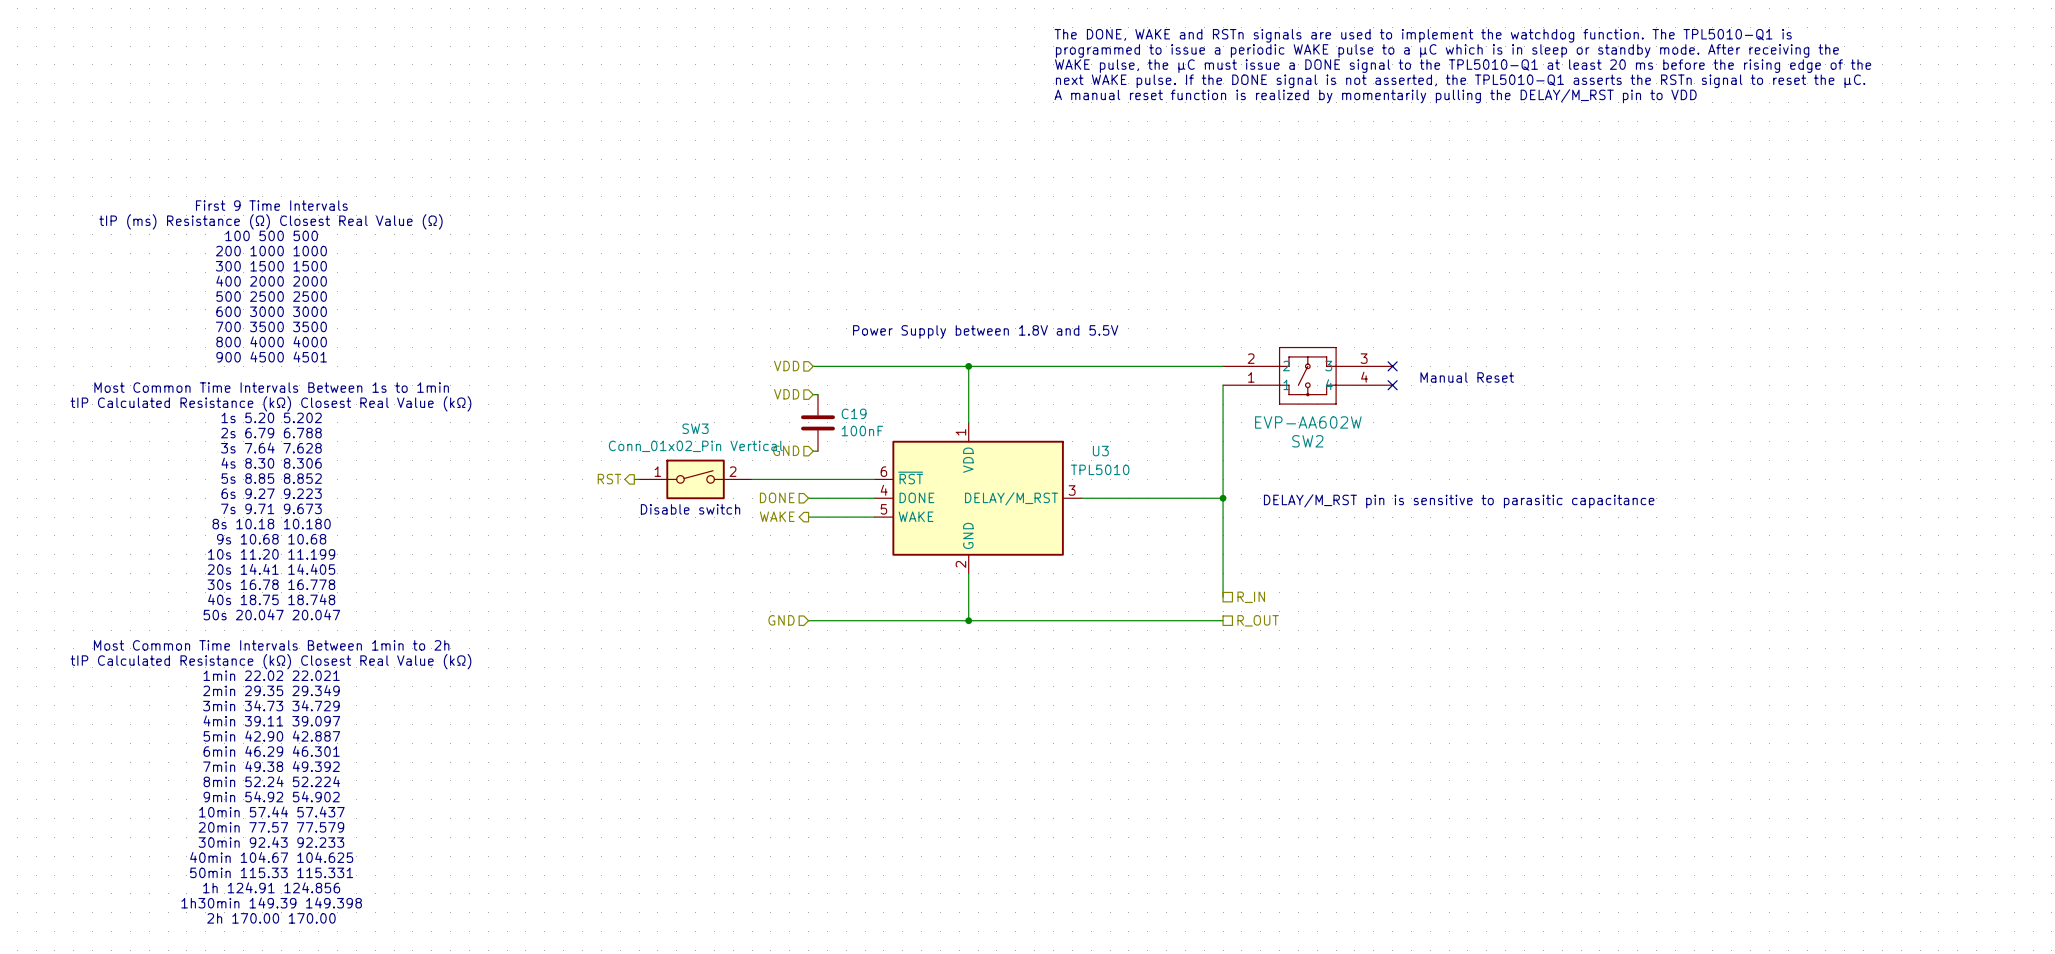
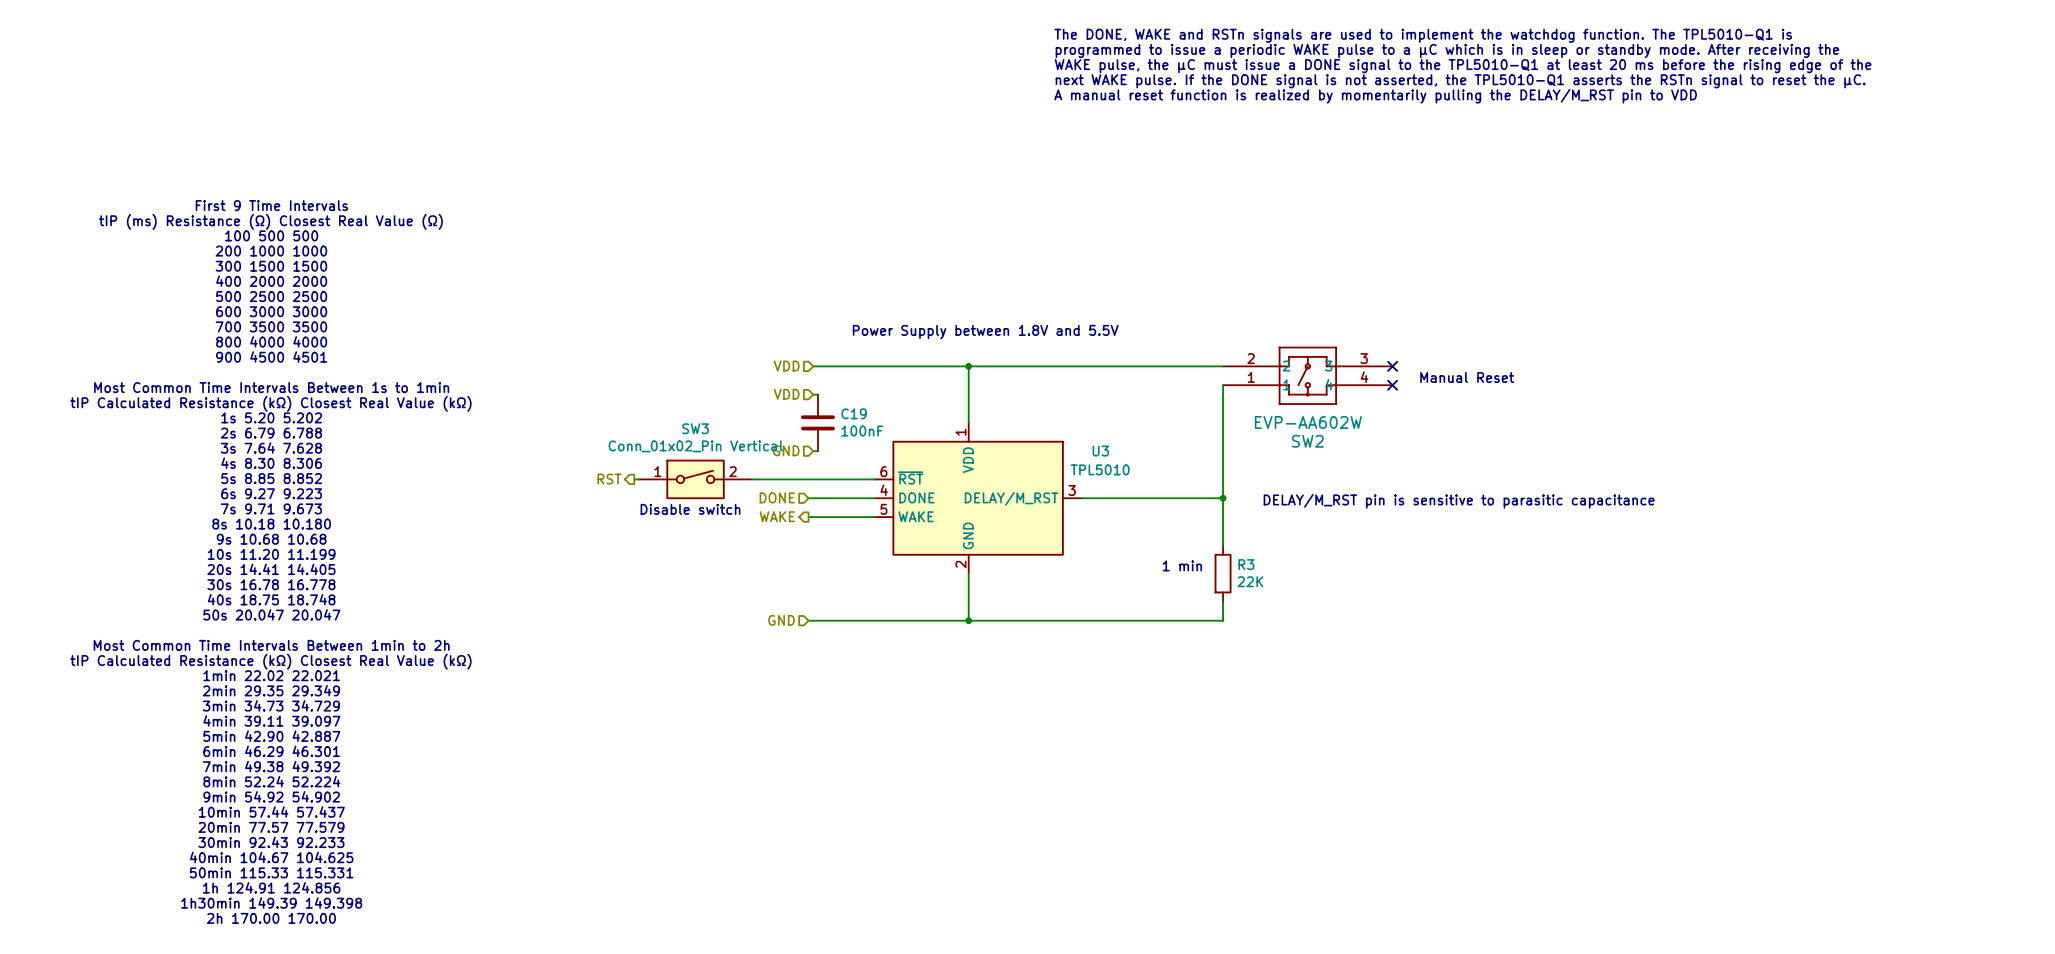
wire: (1223, 545) (1223, 597) -> none
text: none -> 1 min (1182, 565)
R3: none -> 22K (1223, 573)
hierarchical label: R_IN (1251, 597) -> none
wire: none -> (1223, 601) (1223, 620)
hierarchical label: R_OUT (1258, 620) -> none

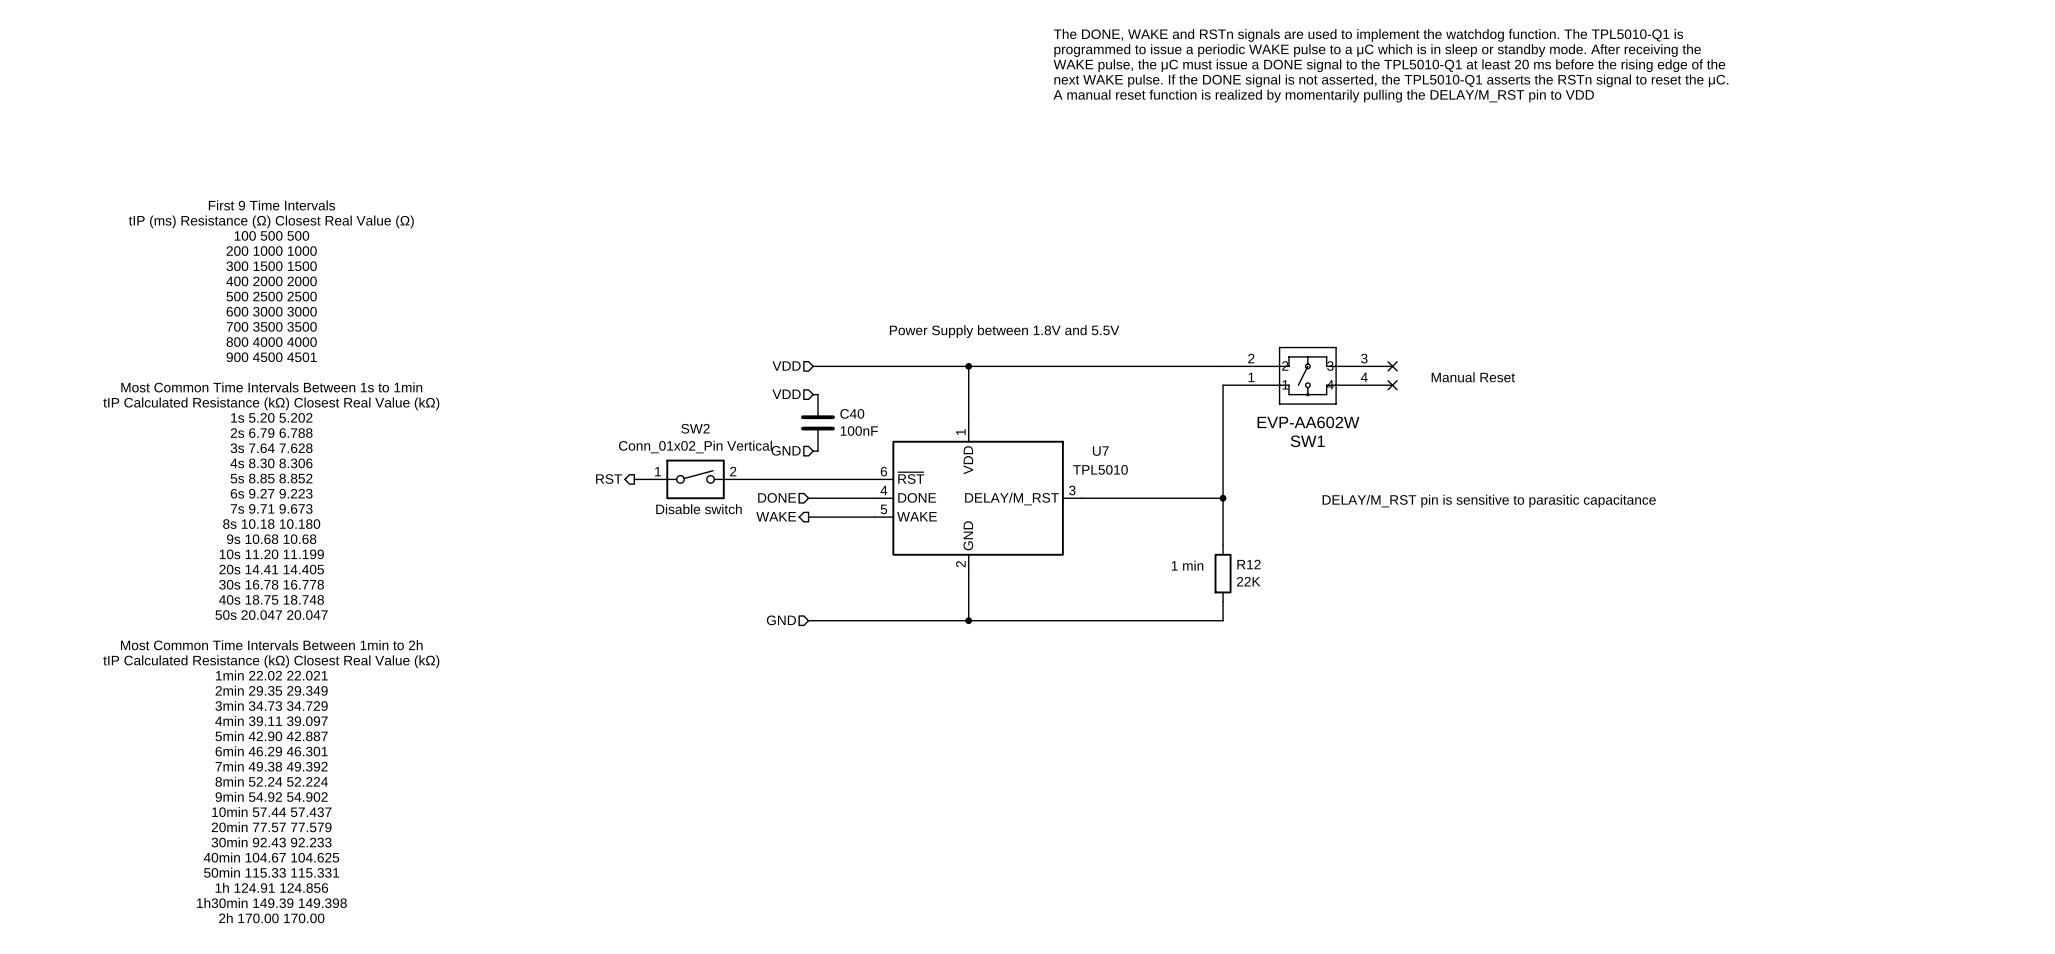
C19 name: C19 (854, 413) -> C40 (852, 413)
SW3 name: SW3 (695, 428) -> SW2 (695, 428)
SW2 name: SW2 (1307, 441) -> SW1 (1307, 441)
U3 name: U3 (1100, 451) -> U7 (1100, 451)
R3 name: R3 (1246, 564) -> R12 (1249, 564)

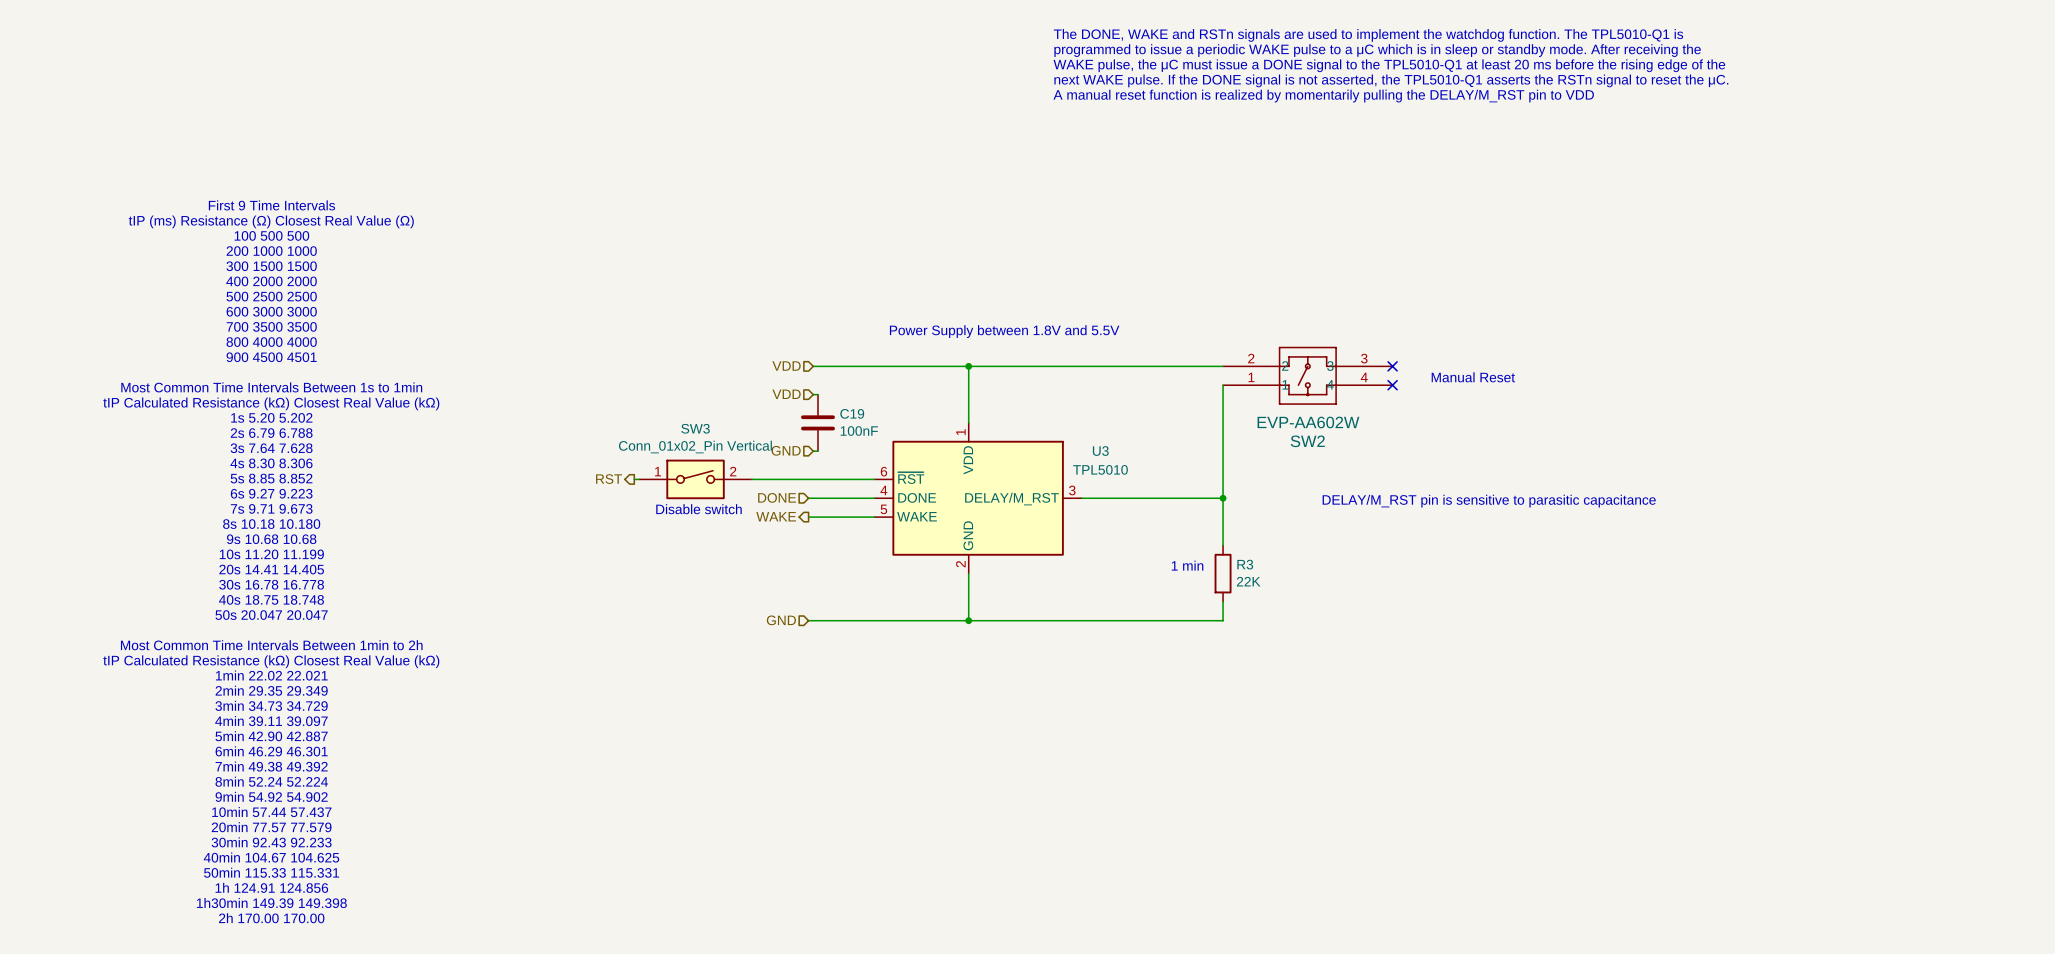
C40 name: C40 (852, 413) -> C19 (852, 413)
SW2 name: SW2 (695, 428) -> SW3 (695, 428)
SW1 name: SW1 (1307, 441) -> SW2 (1307, 441)
U7 name: U7 (1100, 451) -> U3 (1100, 451)
R12 name: R12 (1249, 564) -> R3 (1245, 564)

